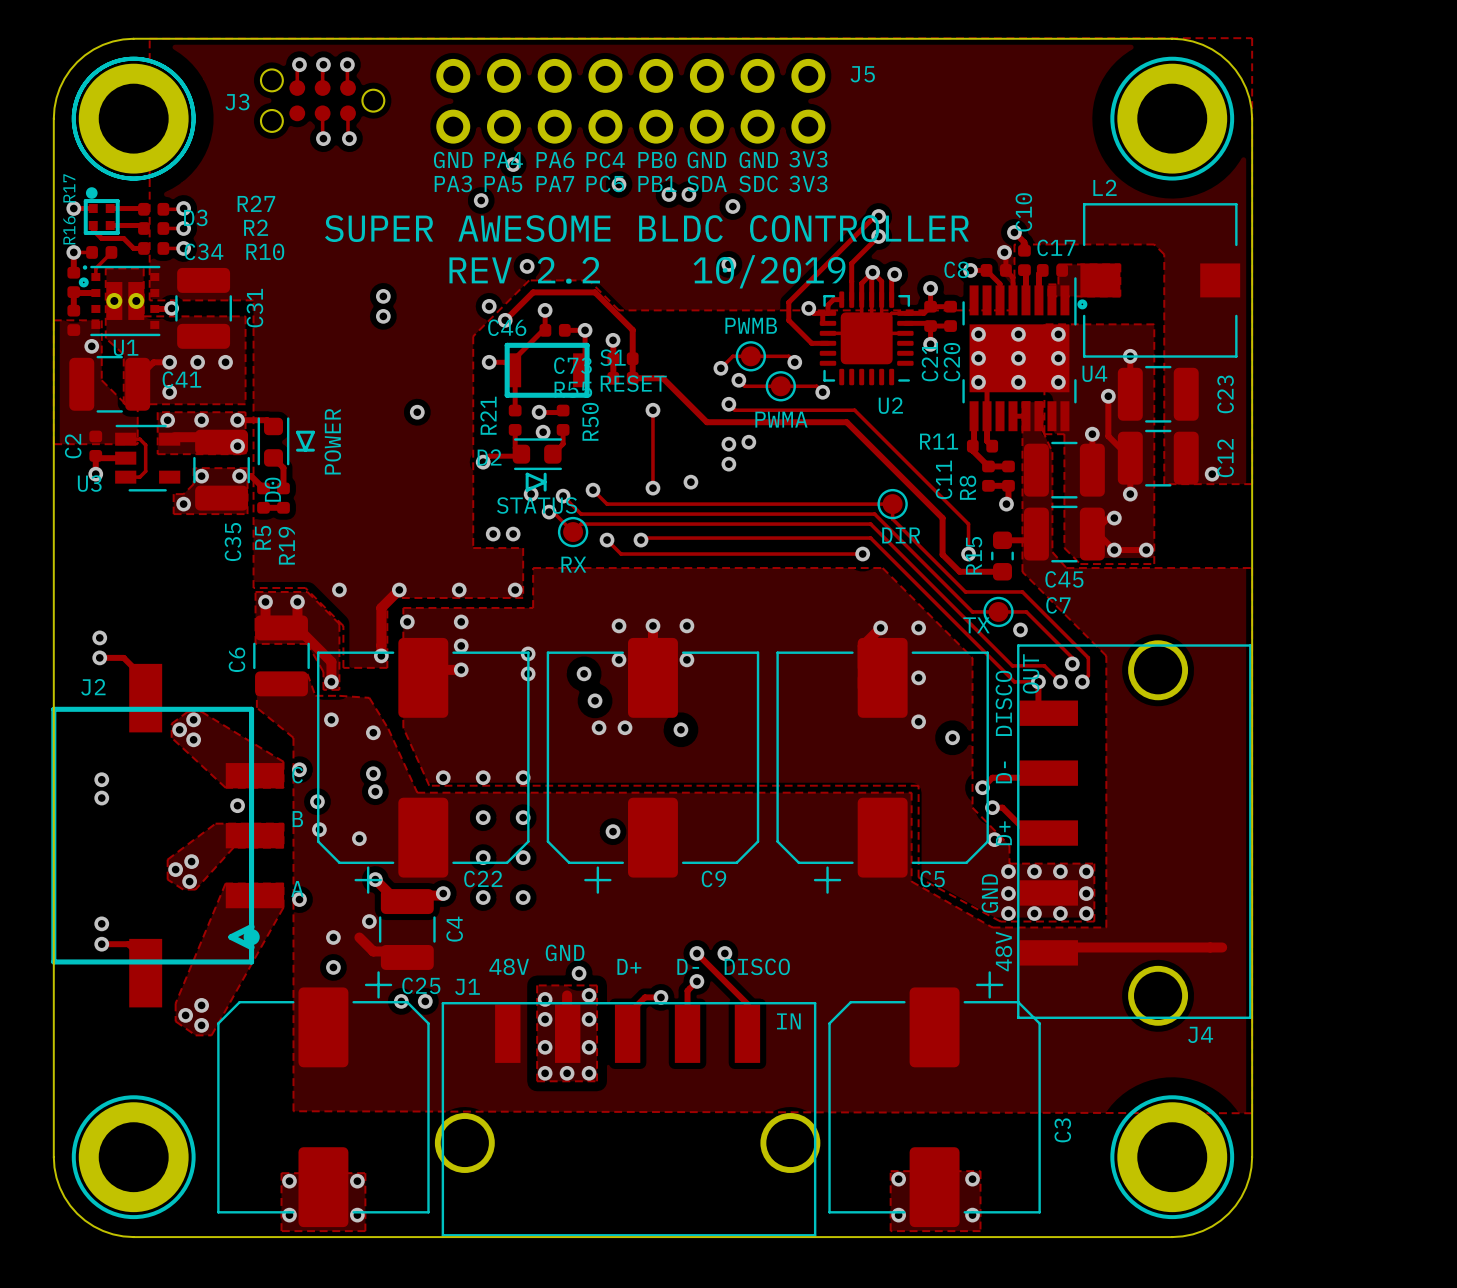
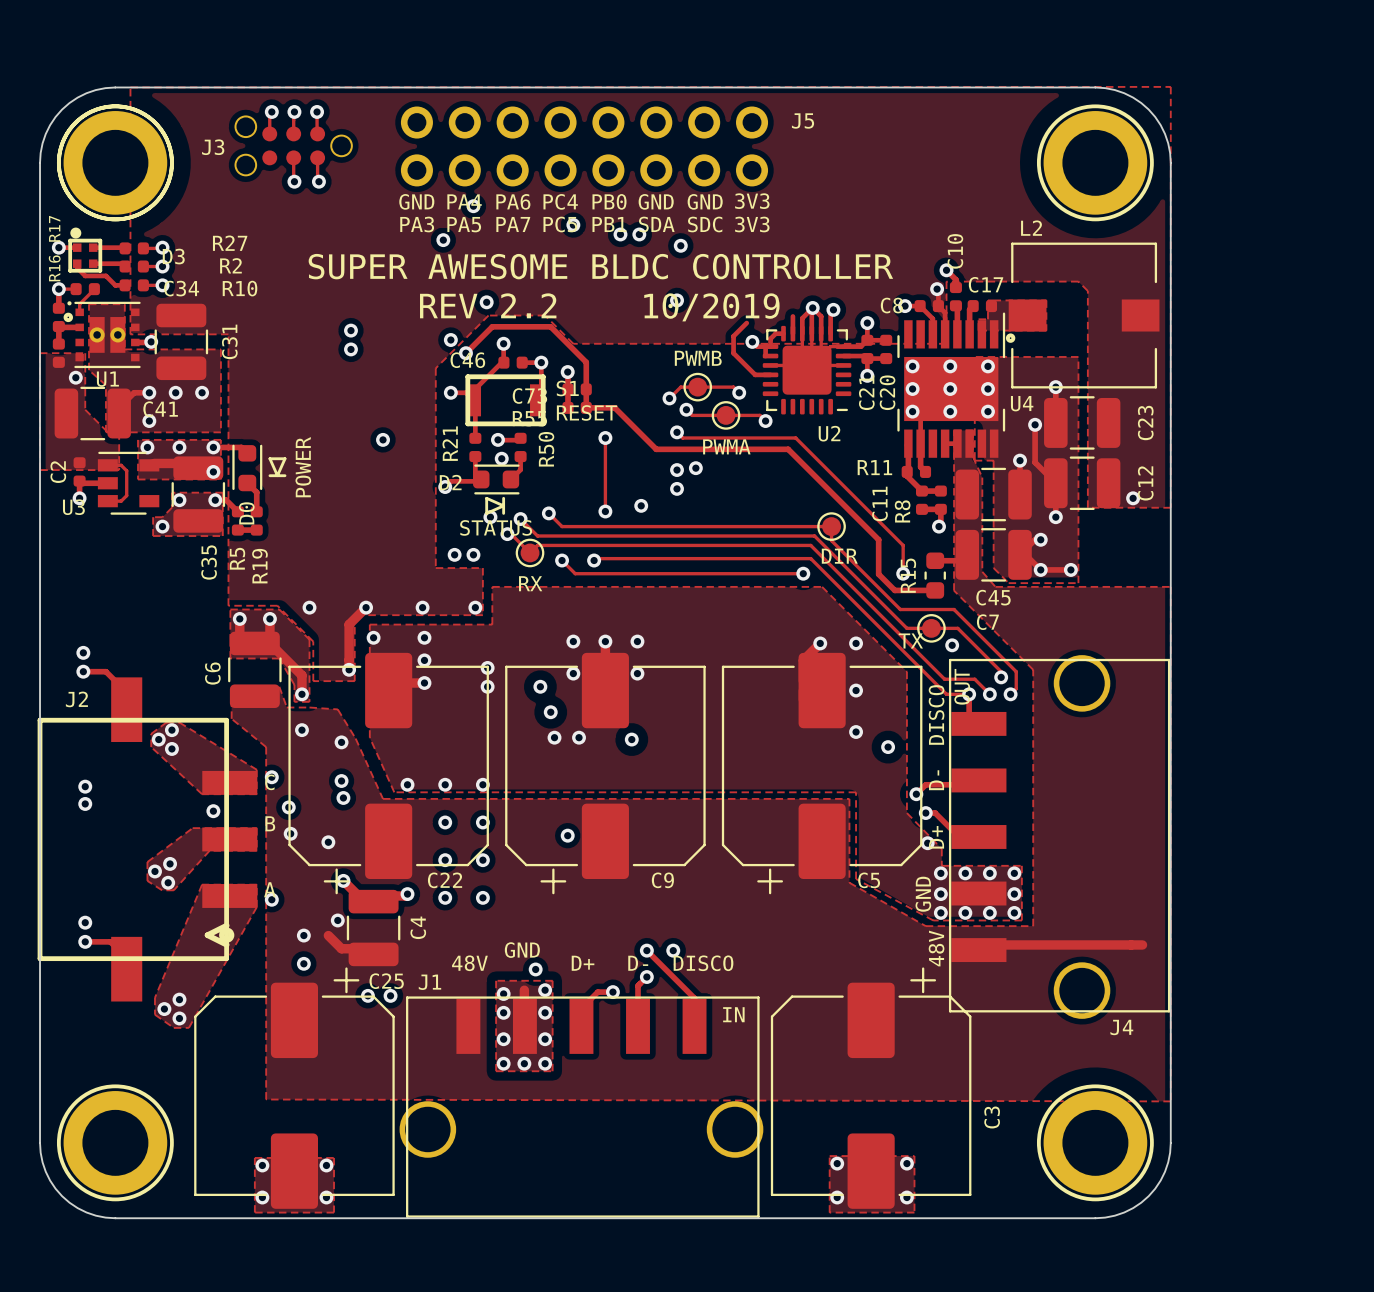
track: (878, 216) (874, 216) (802, 288) -> none
via: (878, 216) -> none
track: (878, 236) (851, 263) (851, 281) -> none
via: (878, 236) -> none

